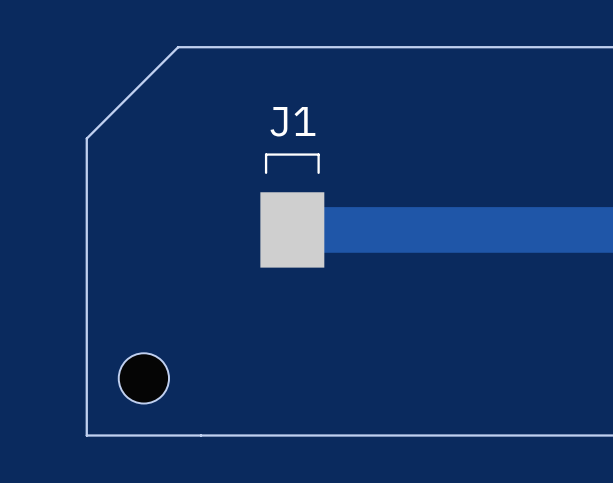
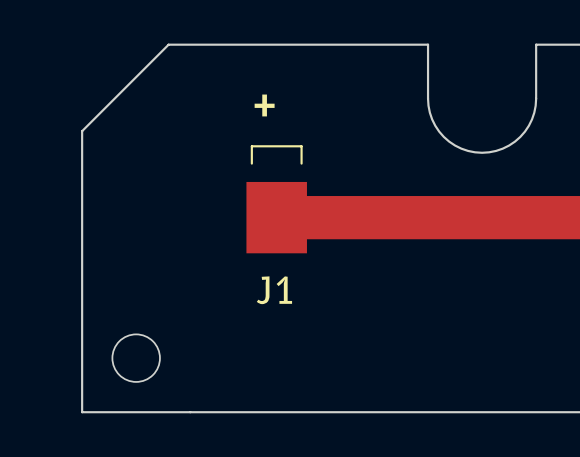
board edge: (452, 47) (566, 47) -> (428, 44) (428, 105) (435, 125) (443, 136) (455, 145) (468, 150) (482, 152) (496, 150) (509, 145) (520, 136) (528, 125) (535, 105) (536, 44)
text: none -> + (264, 105)
J1 name position: J1 (292, 121) -> J1 (274, 290)

